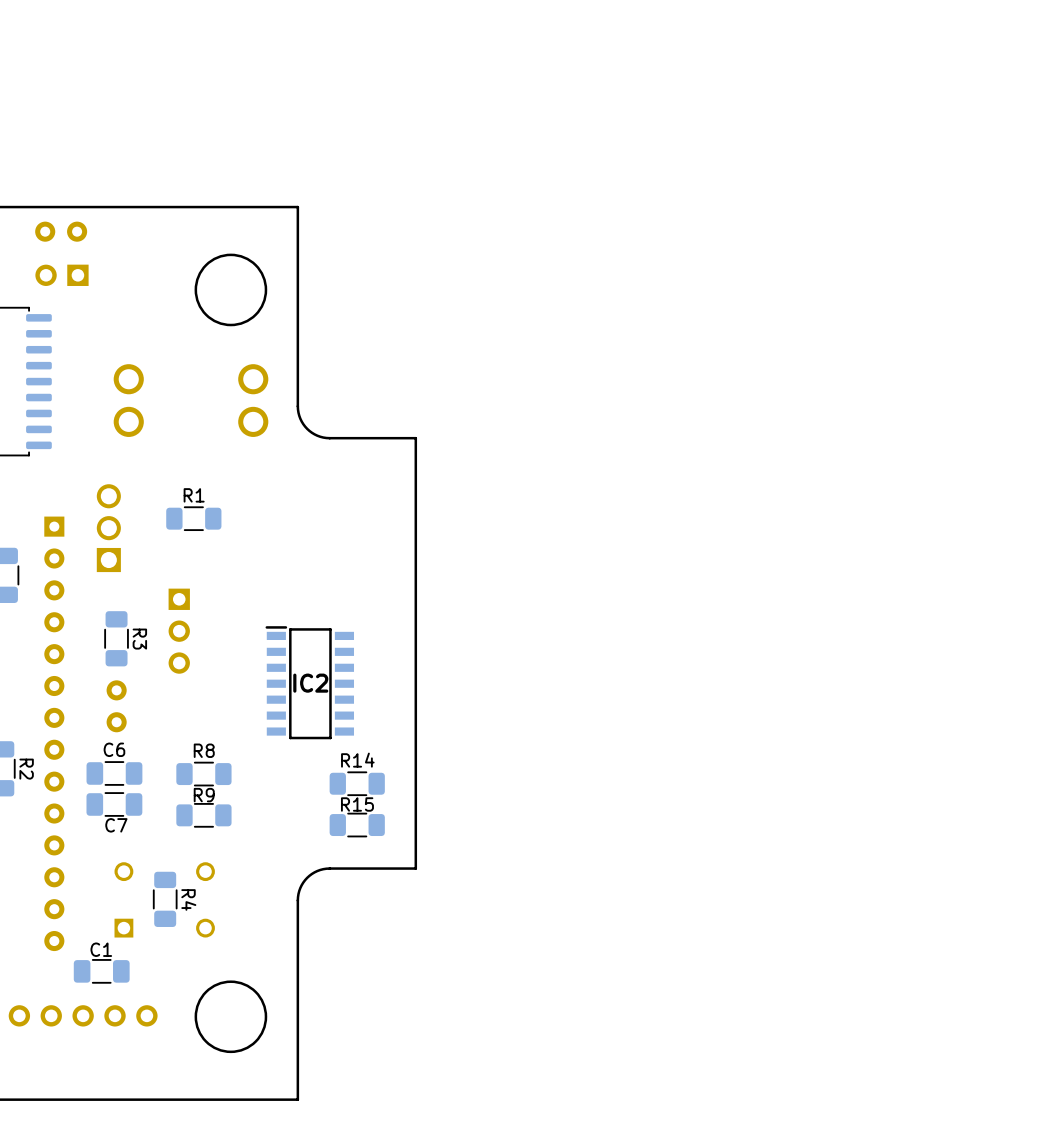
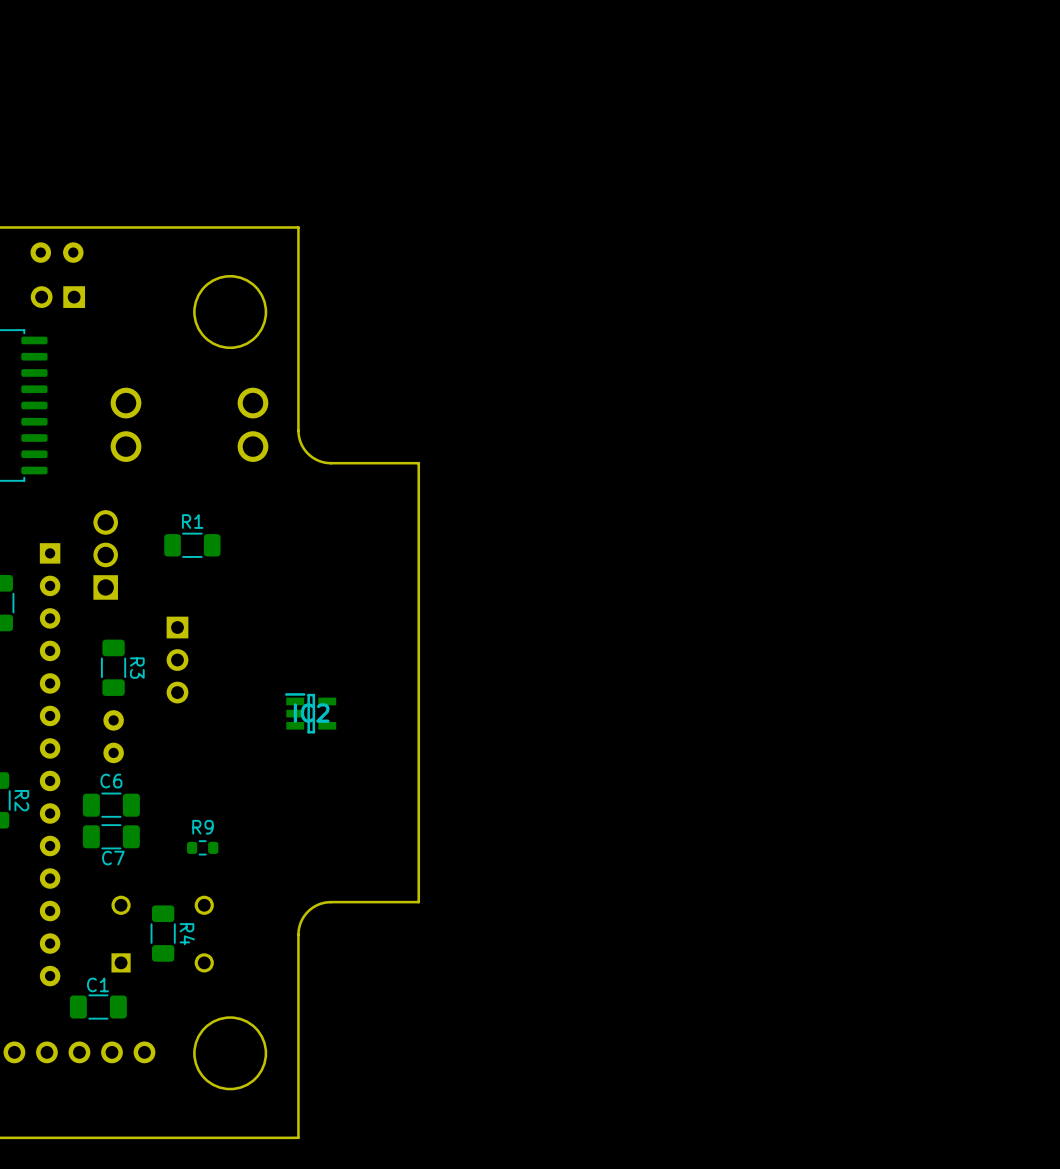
IC2 footprint: [265, 626, 355, 740] -> [285, 693, 337, 734]
R8: (203, 774) -> none
R14: (357, 783) -> none
R9 footprint: [176, 803, 232, 828] -> [187, 840, 219, 856]
R15: (357, 825) -> none

